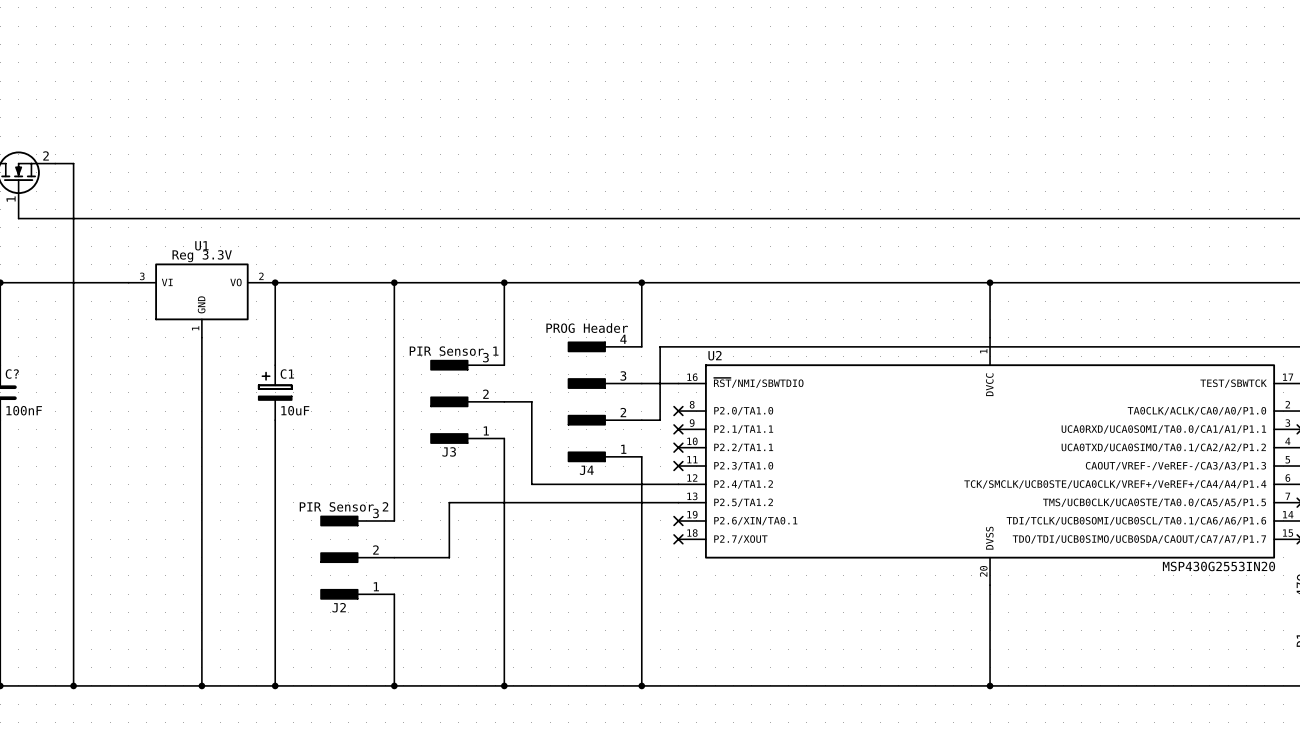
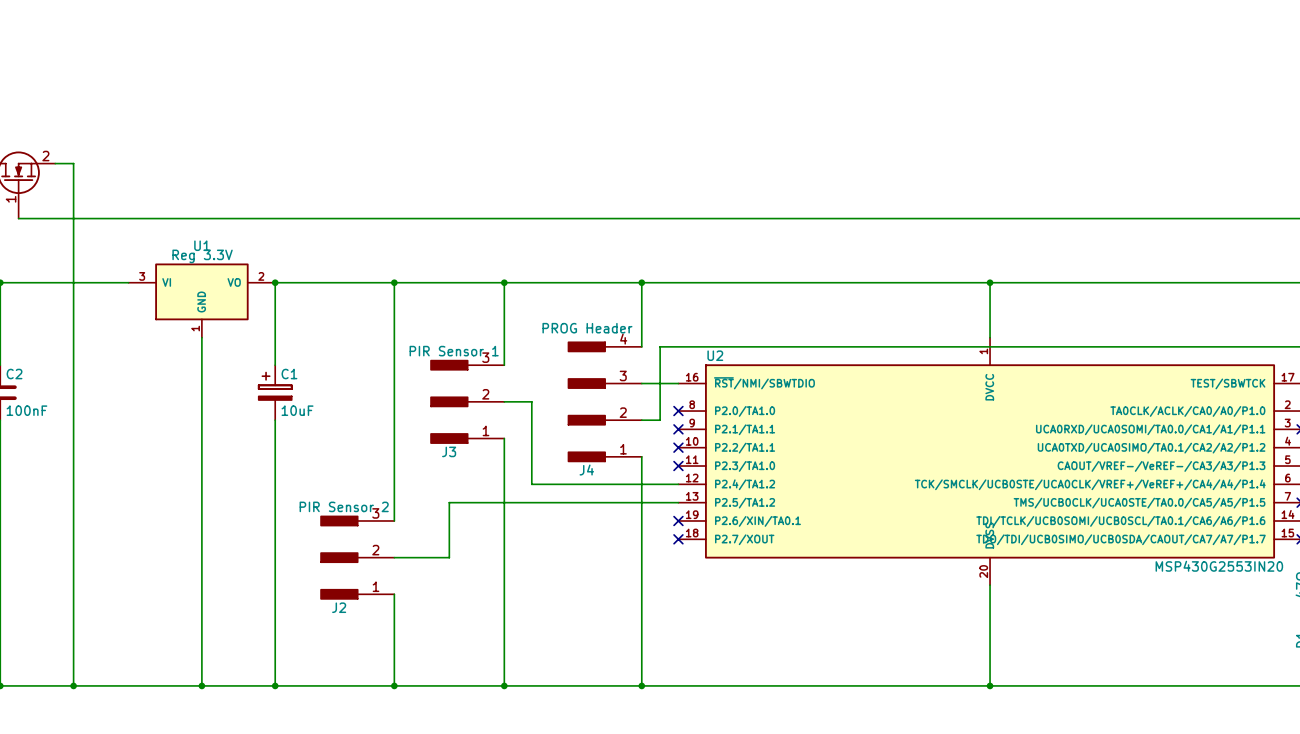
C? name: C? (12, 374) -> C2 (14, 374)

